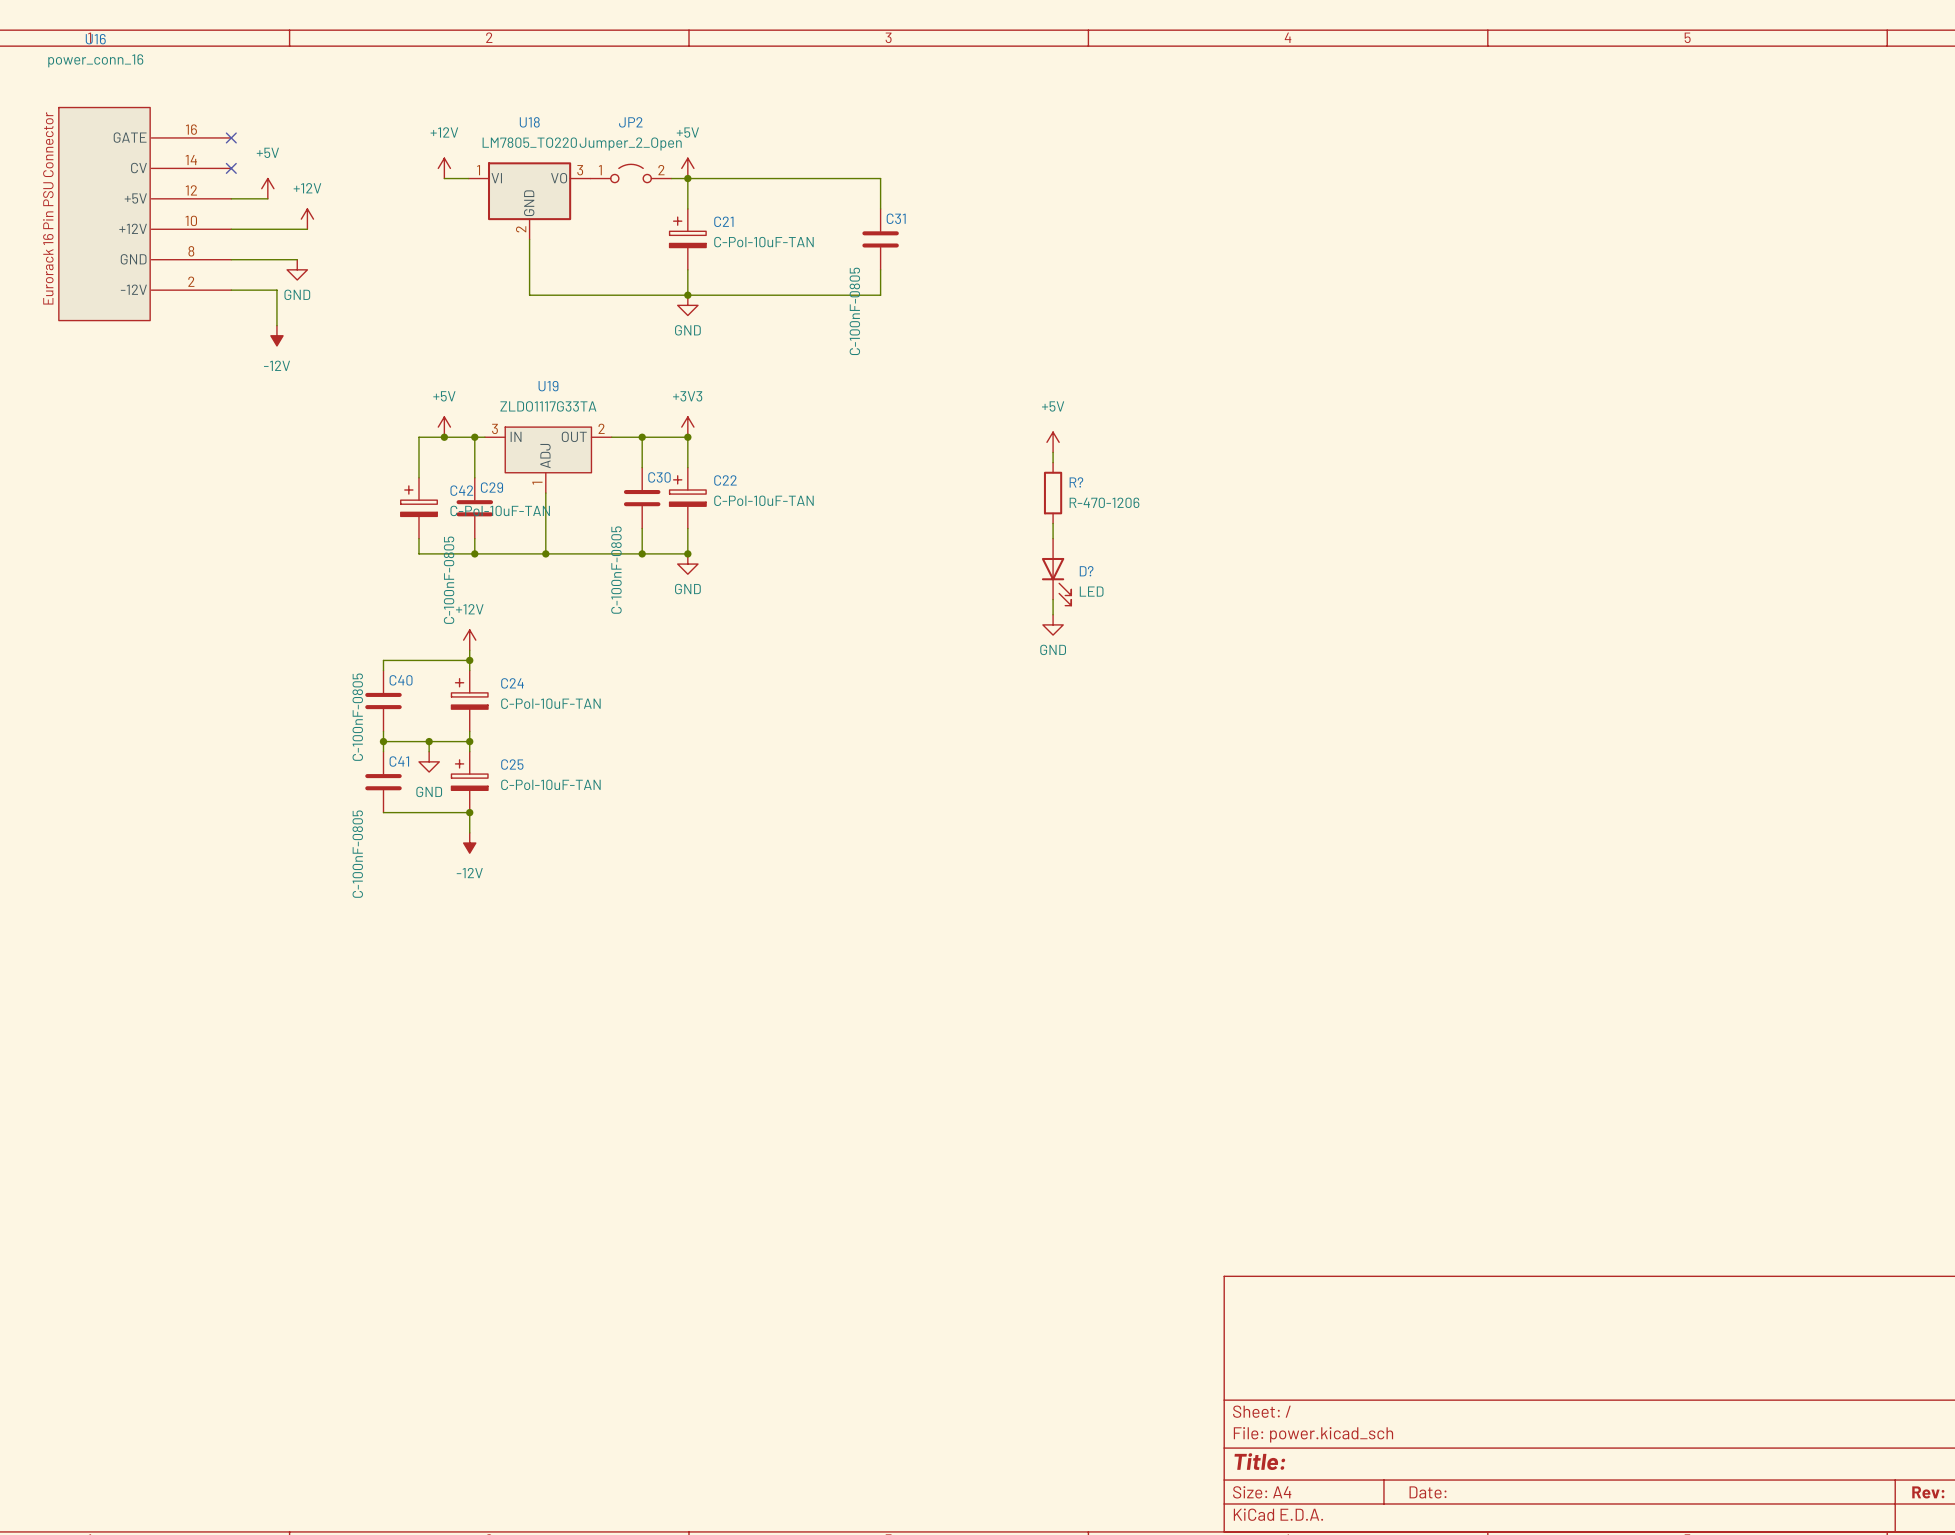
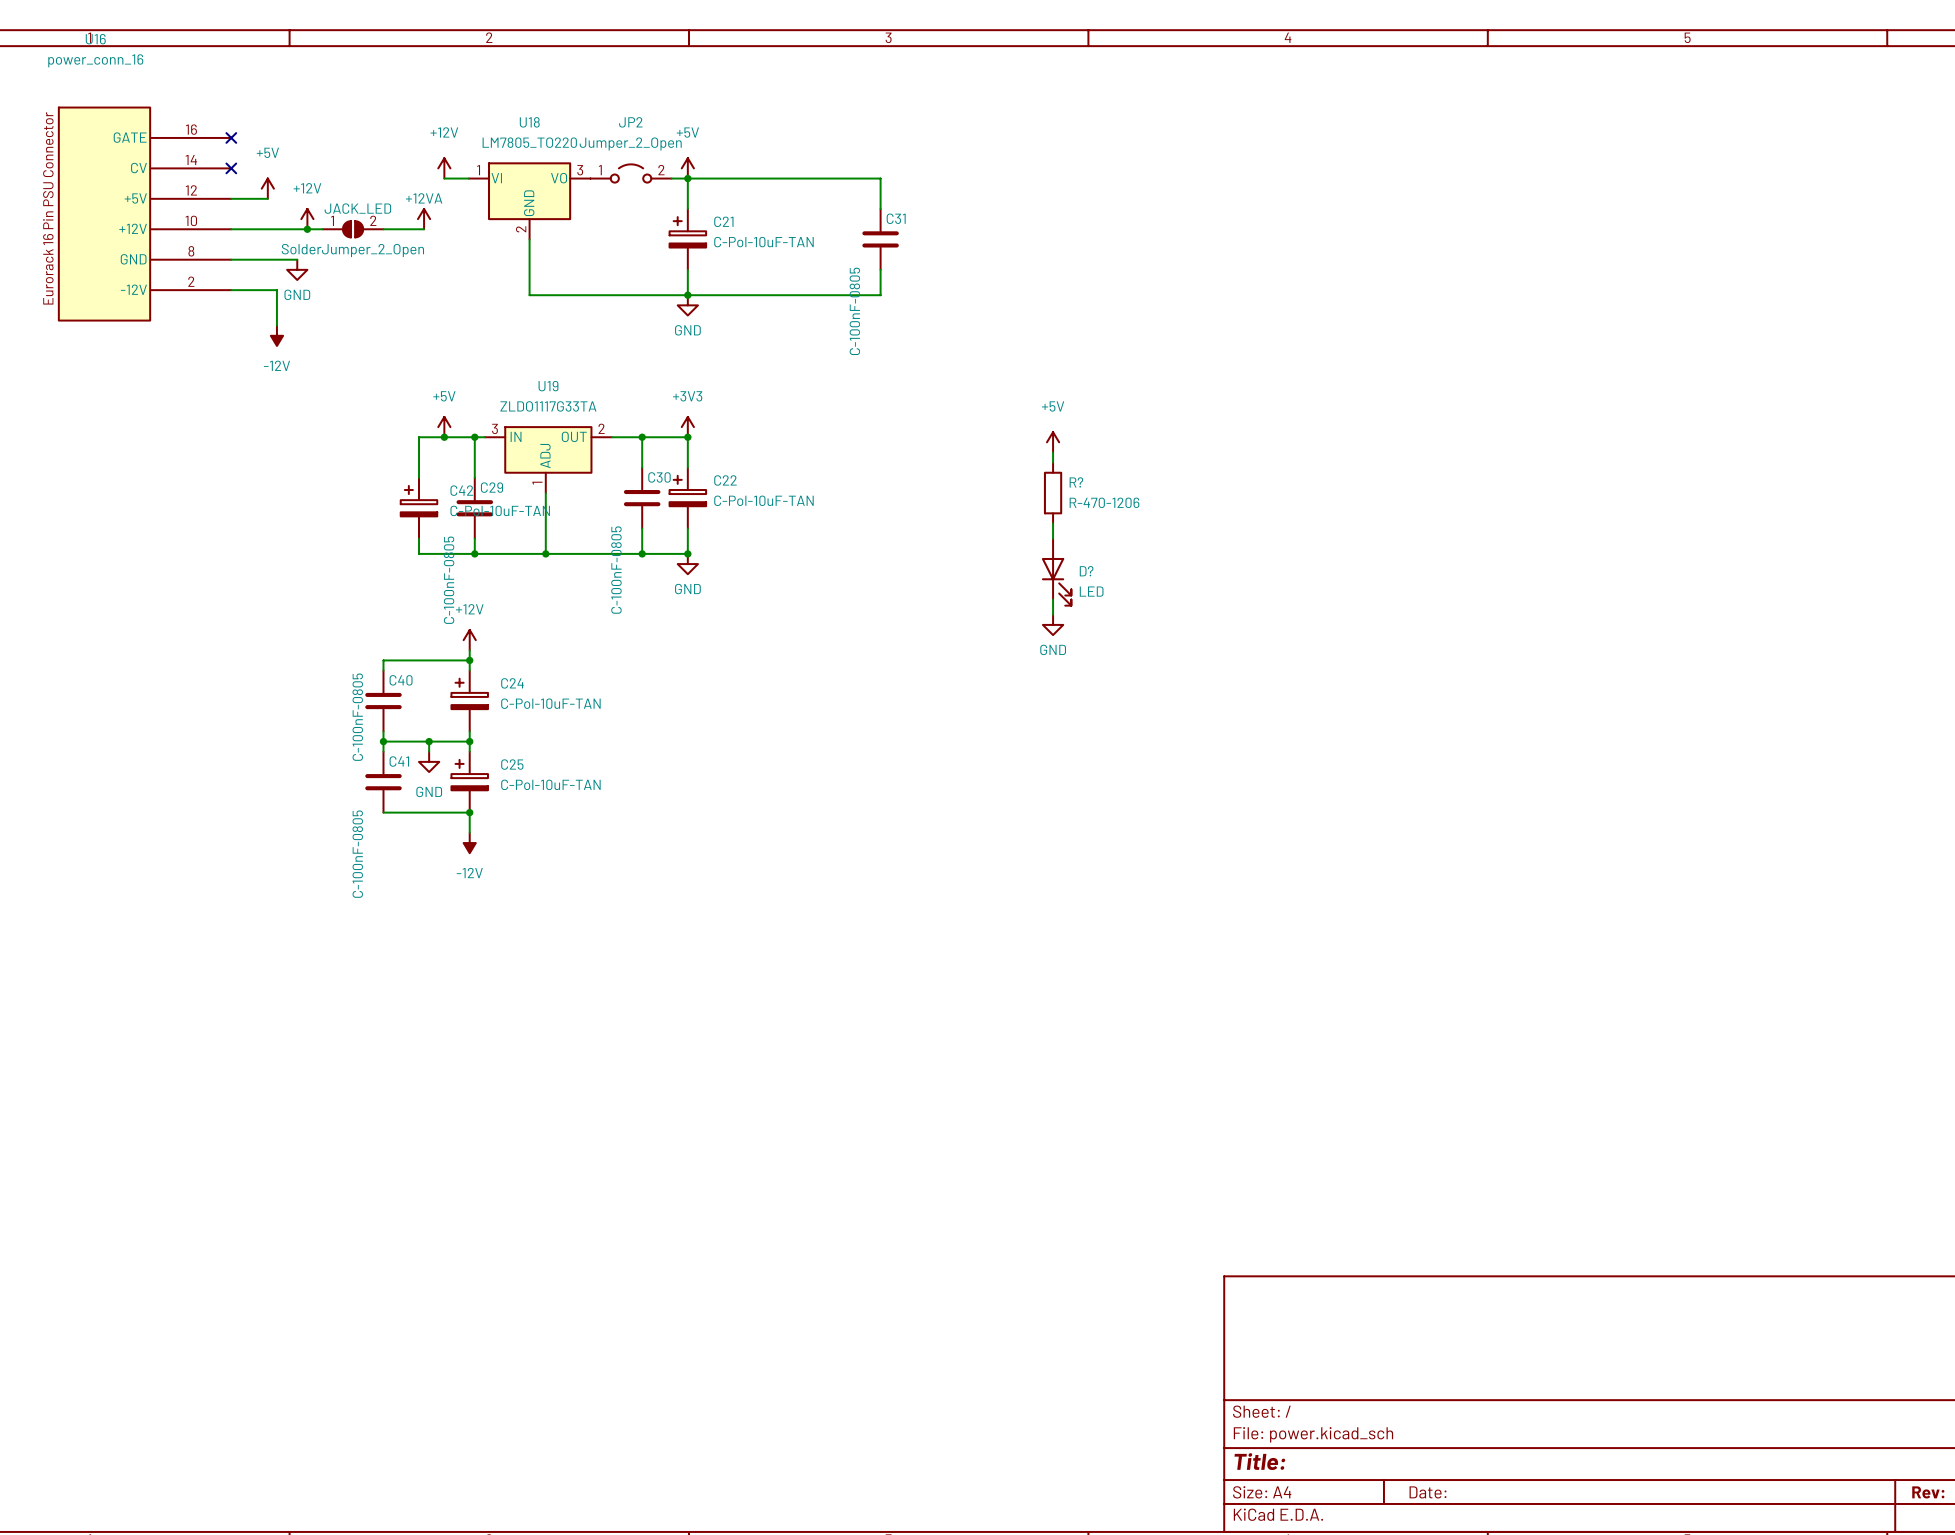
power symbol: none -> +12VA (424, 219)
wire: none -> (307, 229) (322, 229)
junction: none -> (307, 229)
JACK_LED: none -> SolderJumper_2_Open (353, 229)
wire: none -> (383, 229) (424, 229)

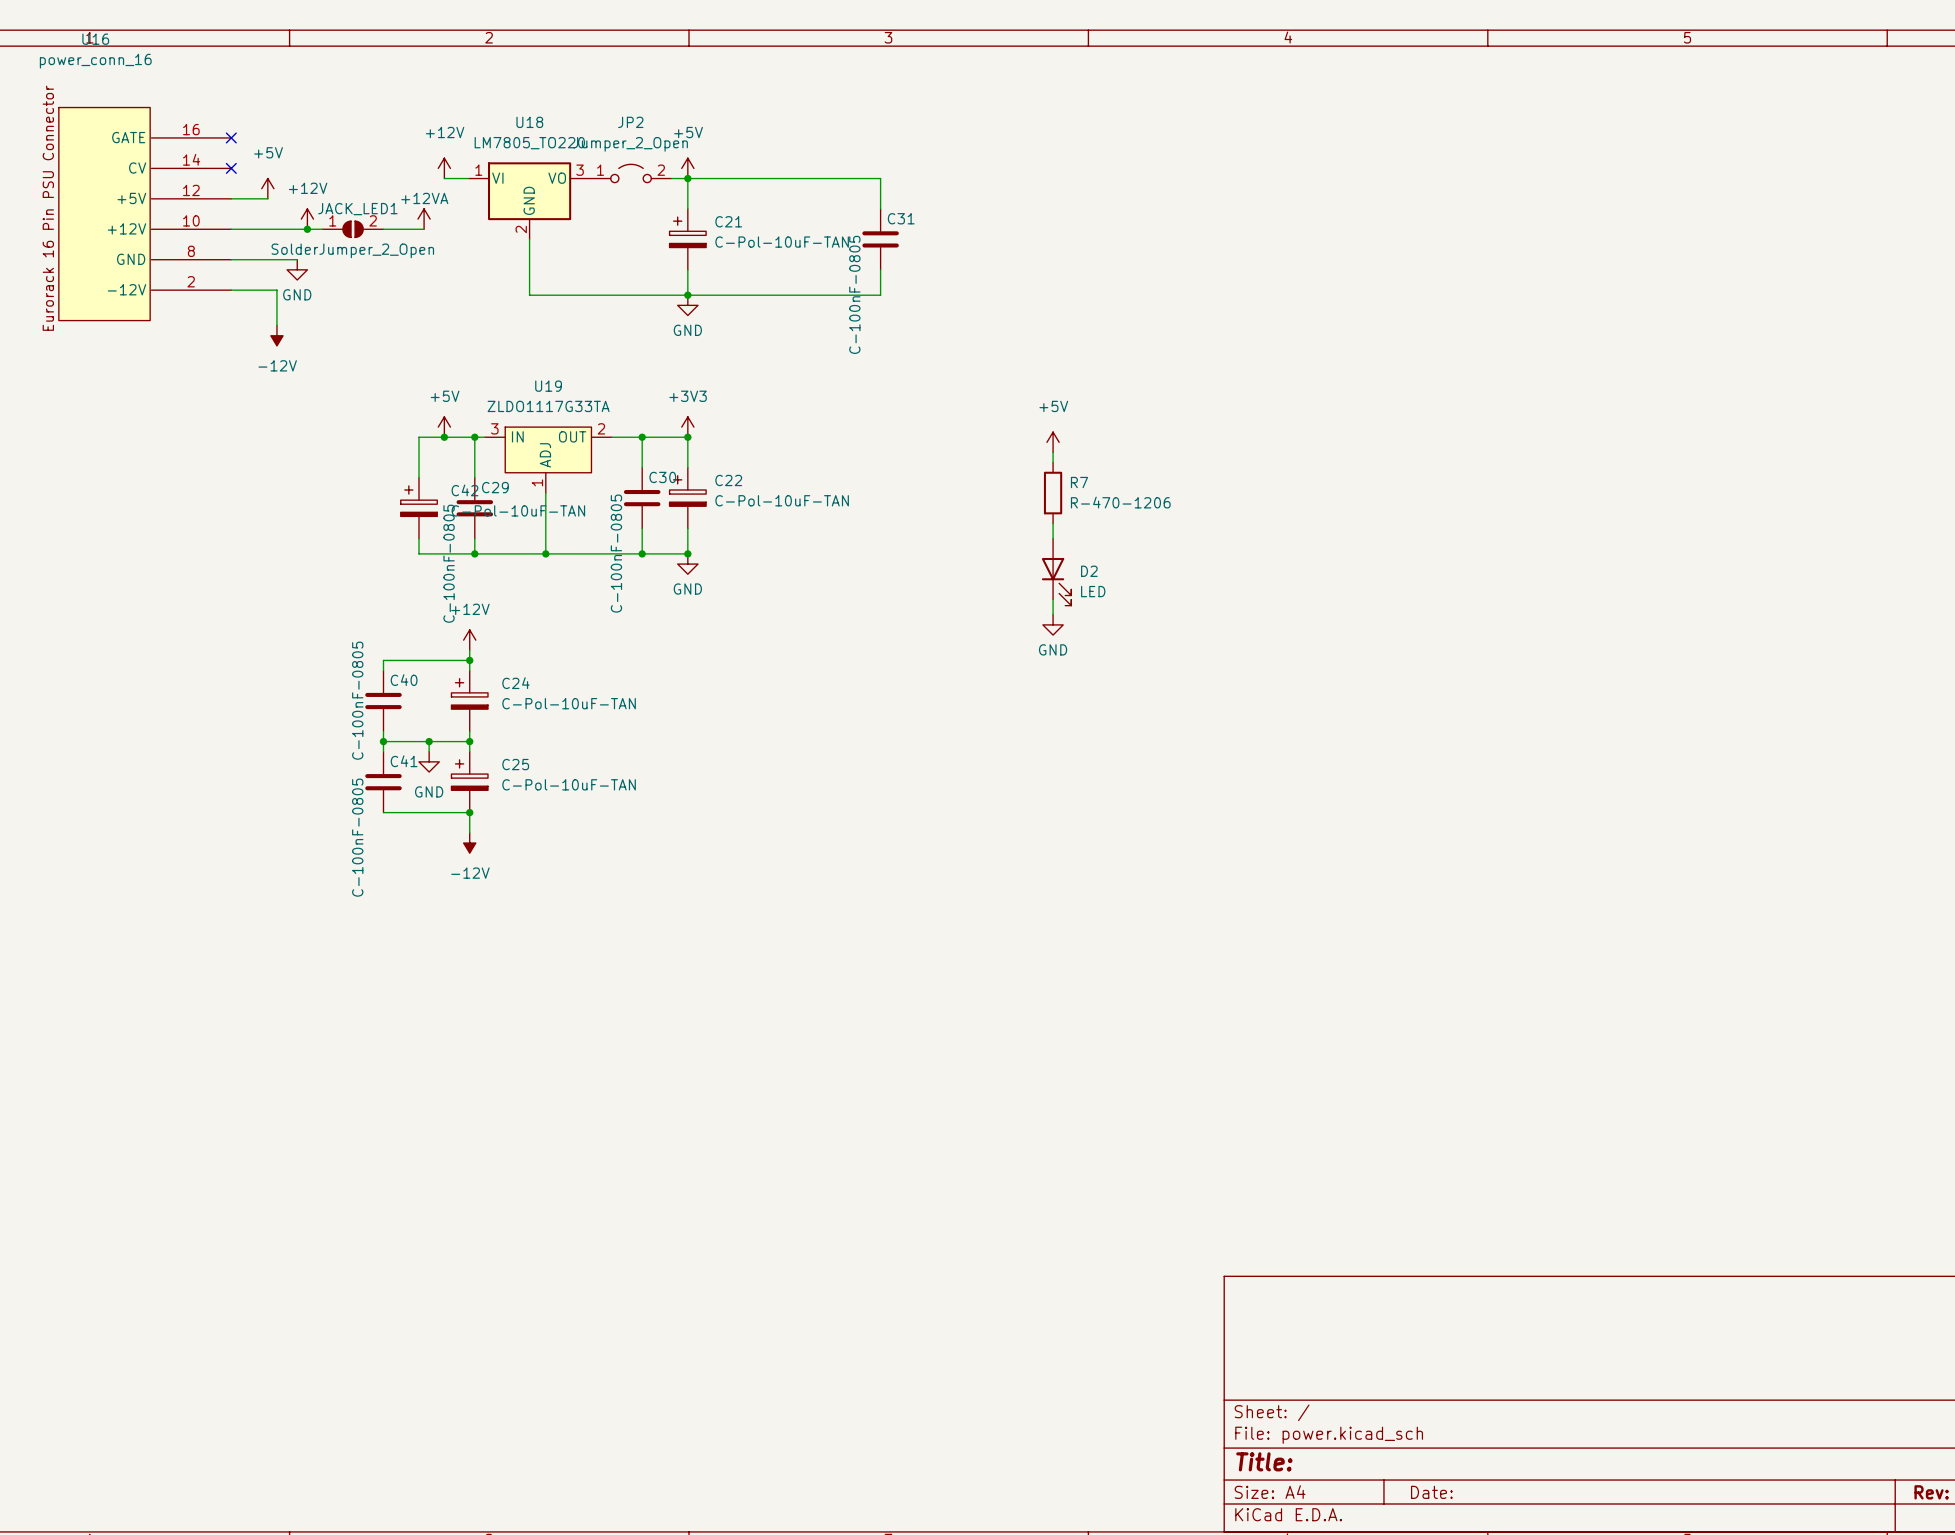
JACK_LED name: JACK_LED (357, 208) -> JACK_LED1 (357, 209)
R? name: R? (1076, 482) -> R7 (1079, 482)
D? name: D? (1086, 571) -> D2 (1089, 571)

